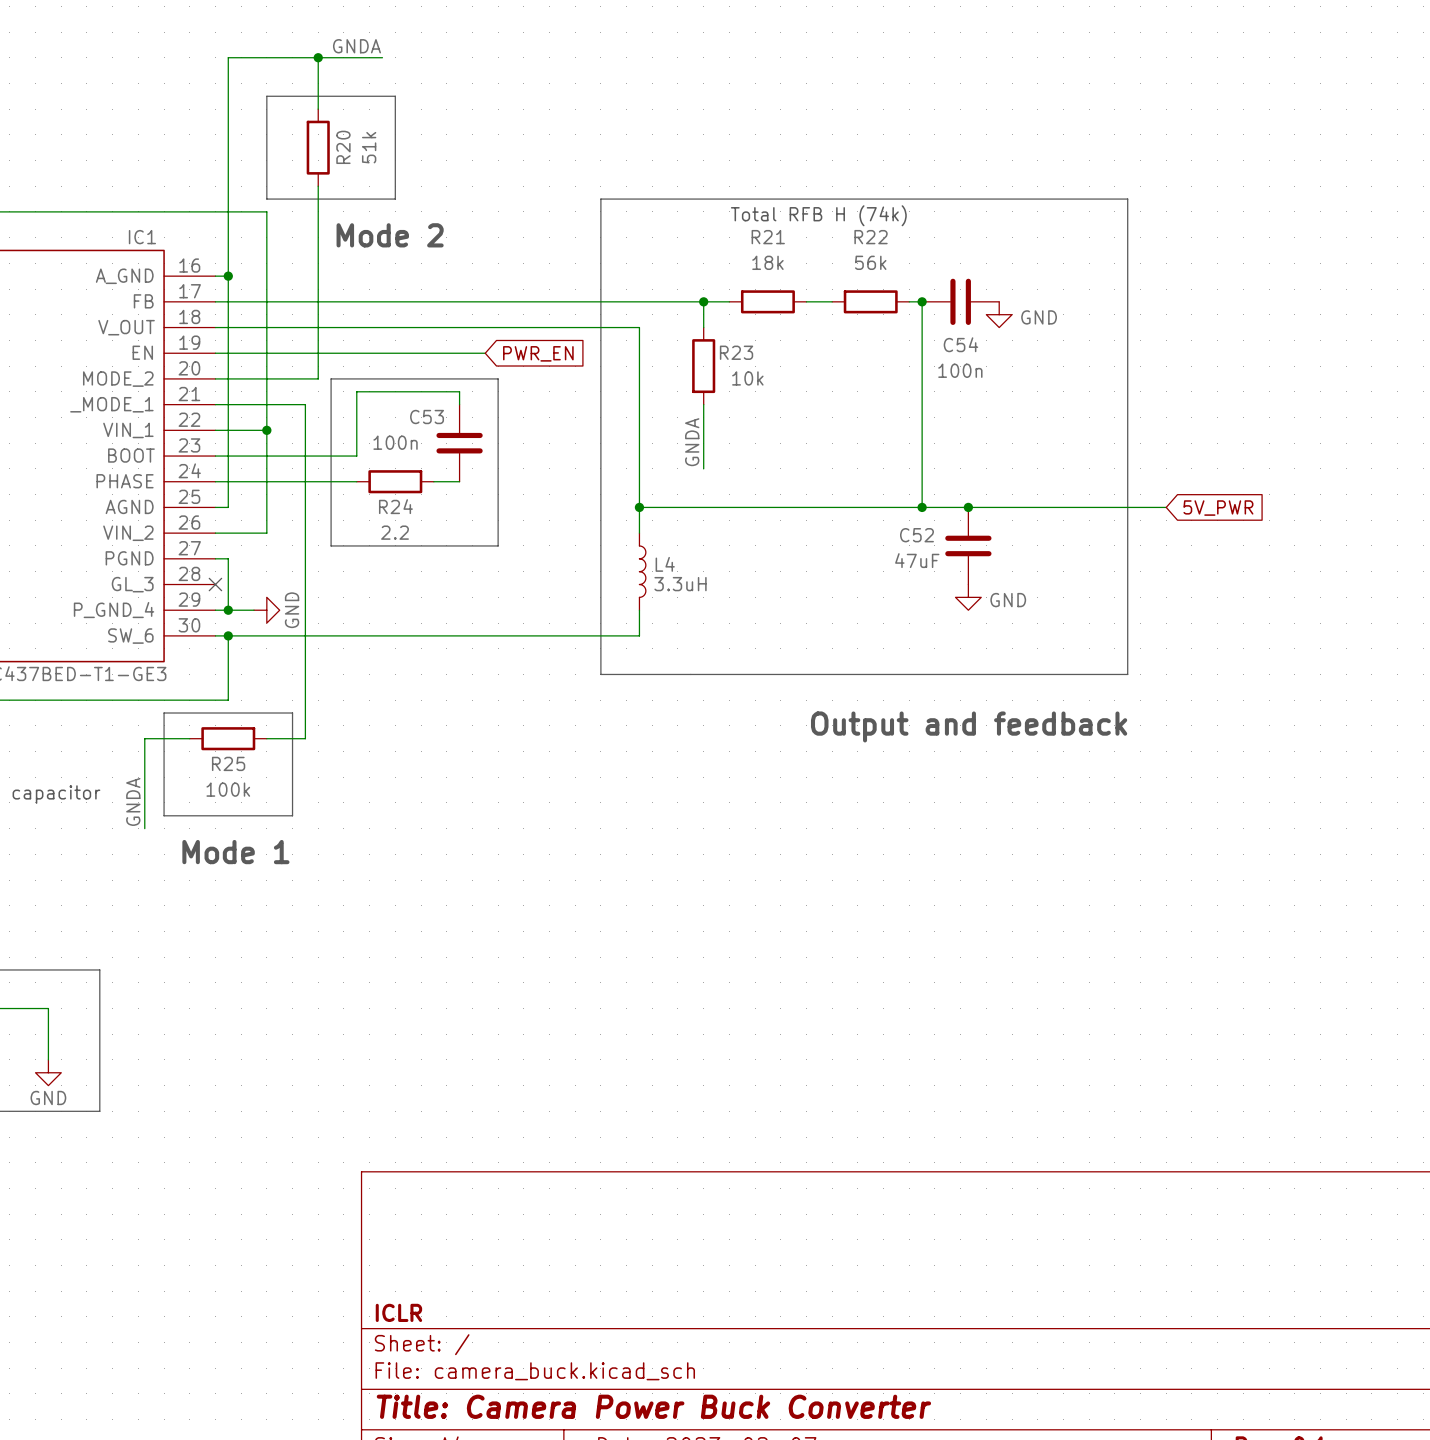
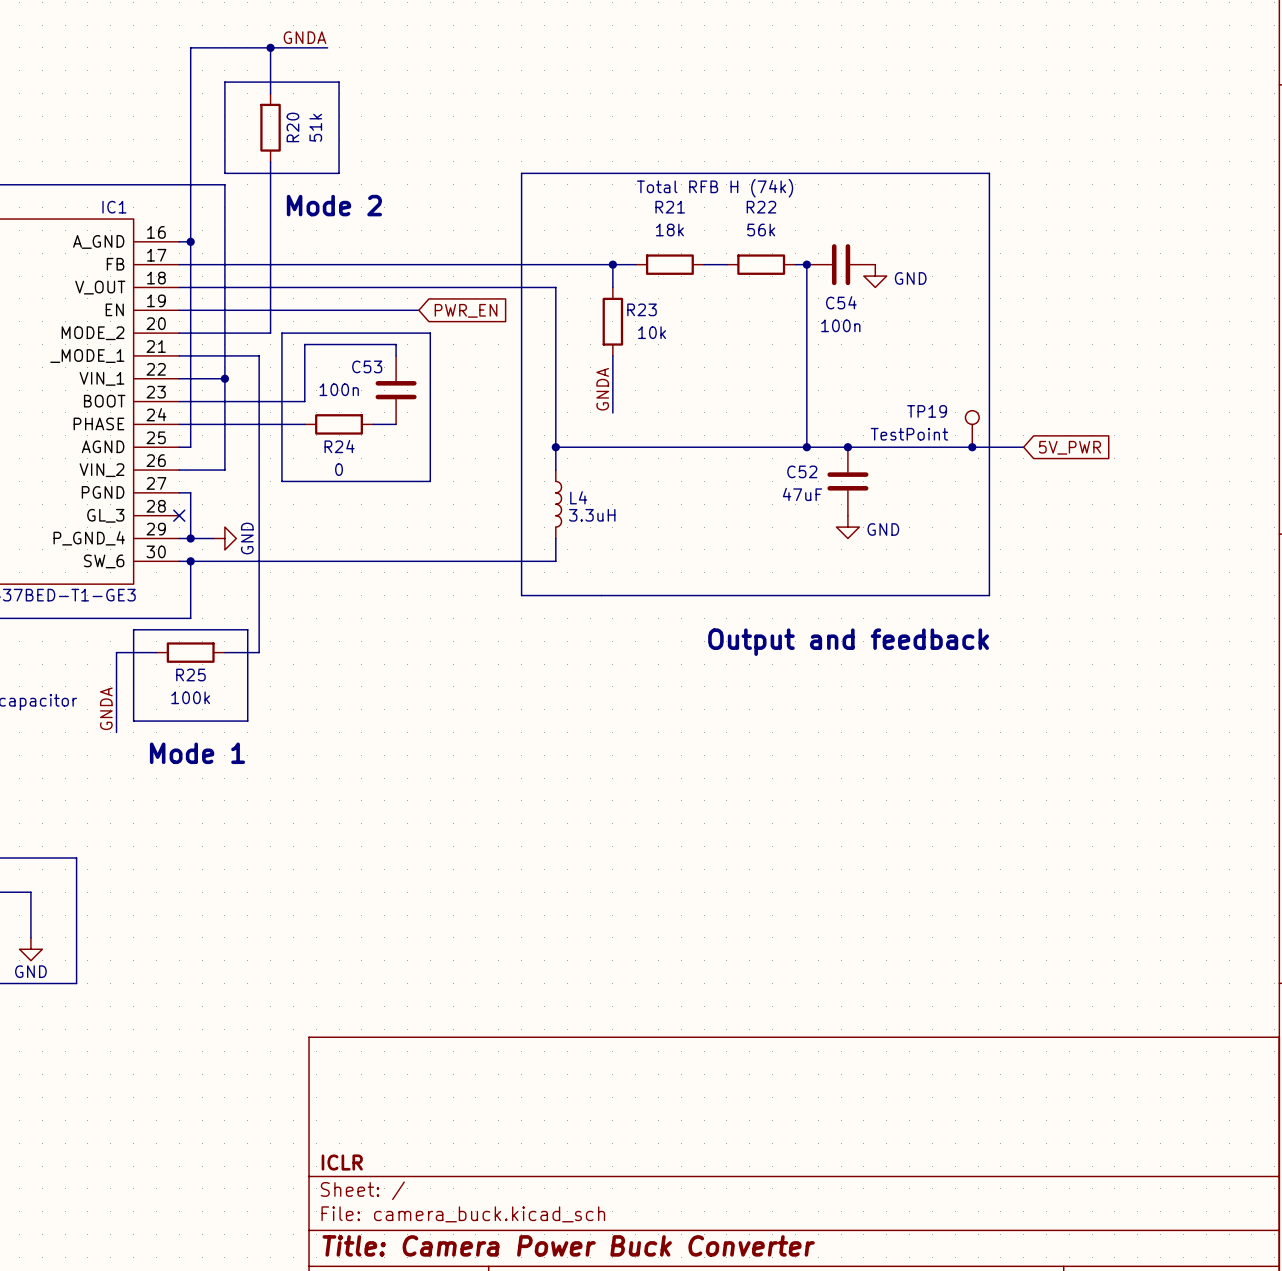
TP19: none -> TestPoint (972, 428)
junction: none -> (972, 447)
R24 value: 2.2 (395, 532) -> 0 (339, 469)

